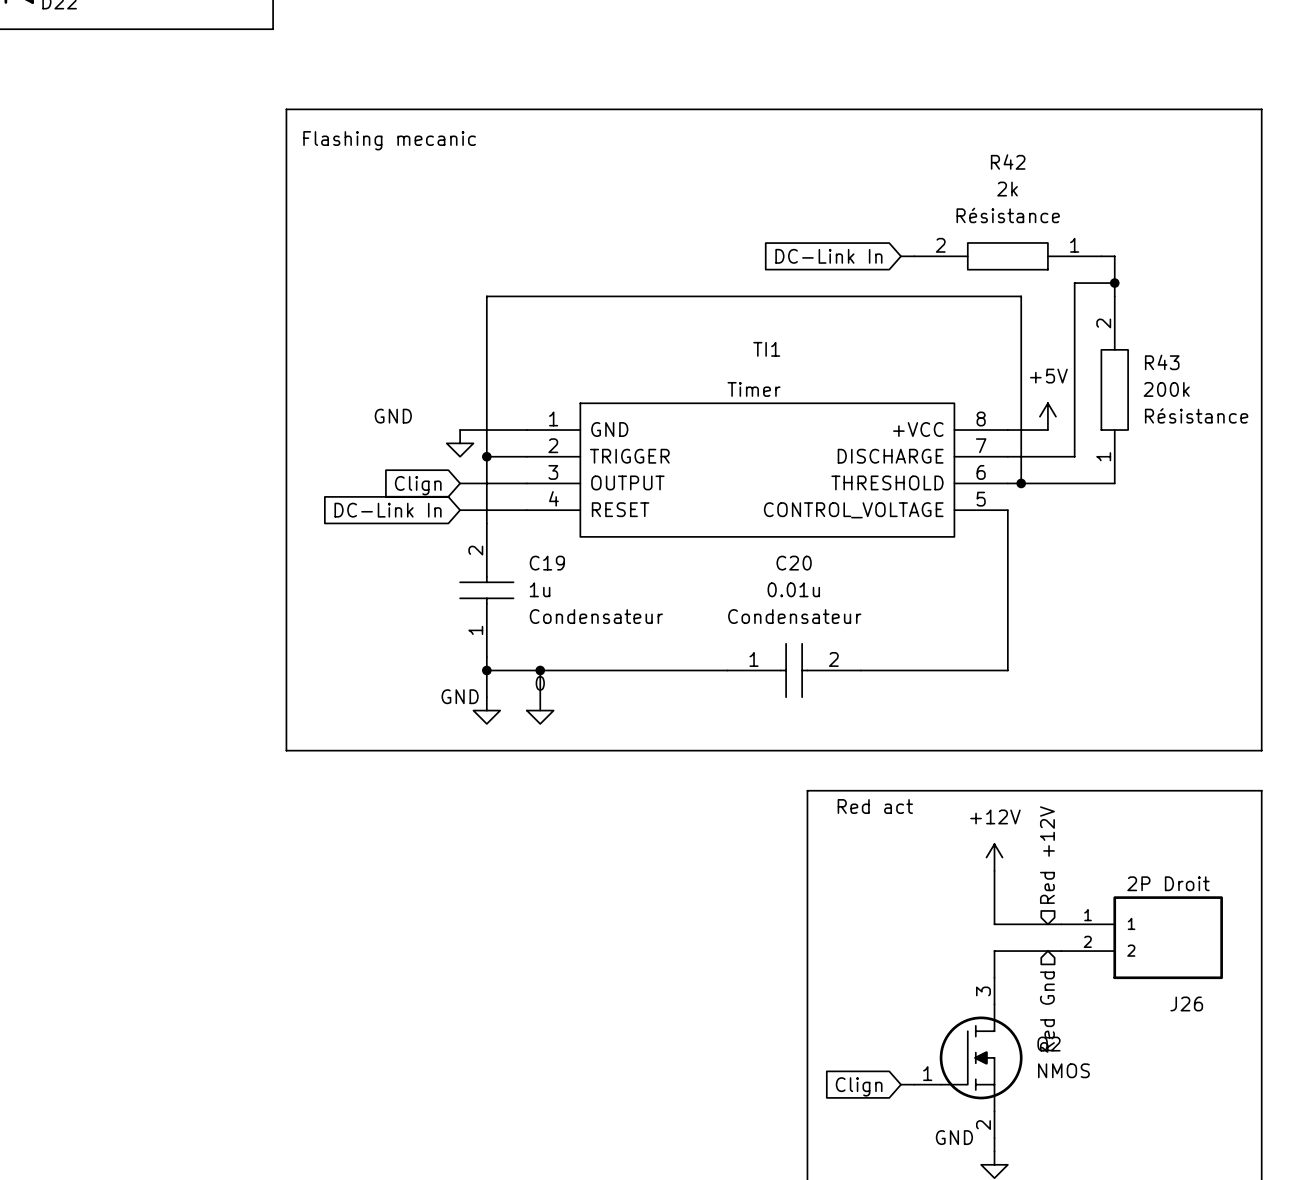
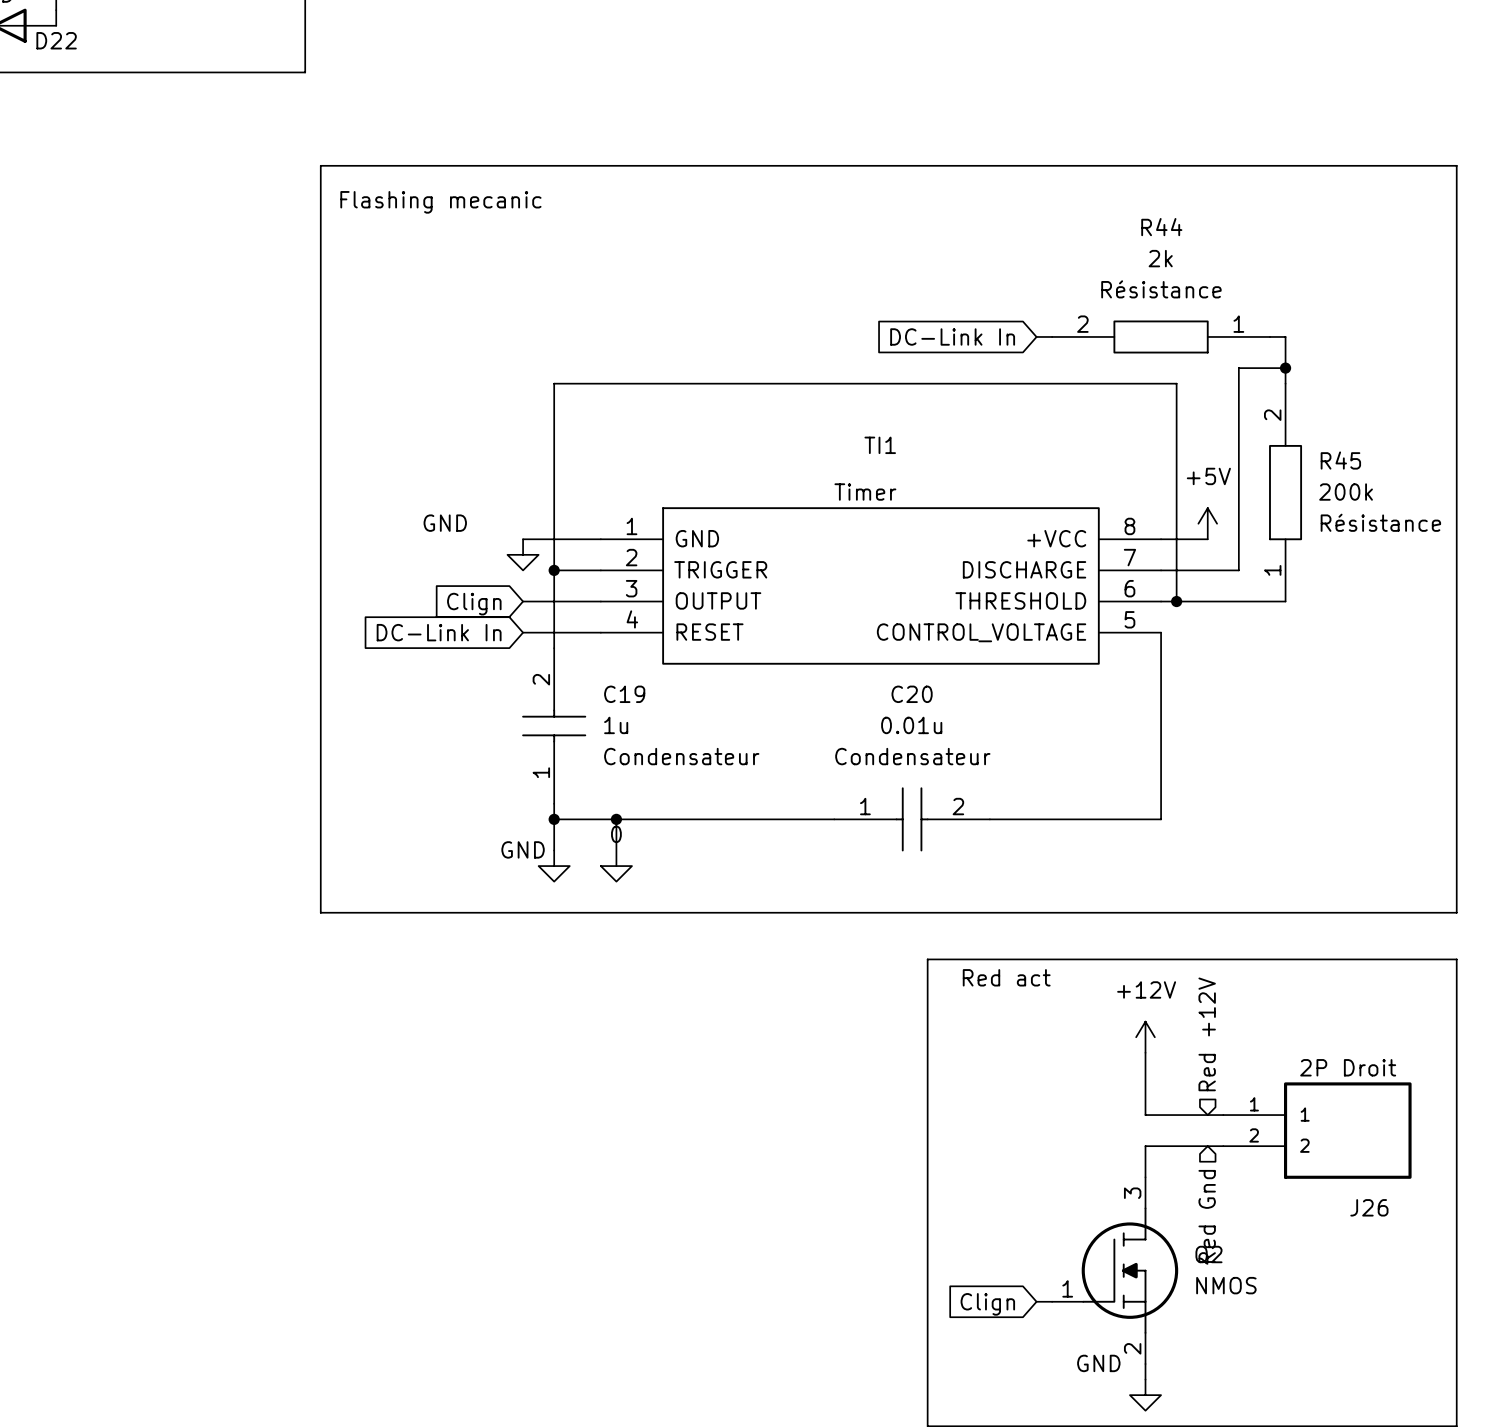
R42 name: R42 (1008, 162) -> R44 (1161, 227)
R43 name: R43 (1162, 362) -> R45 (1340, 460)

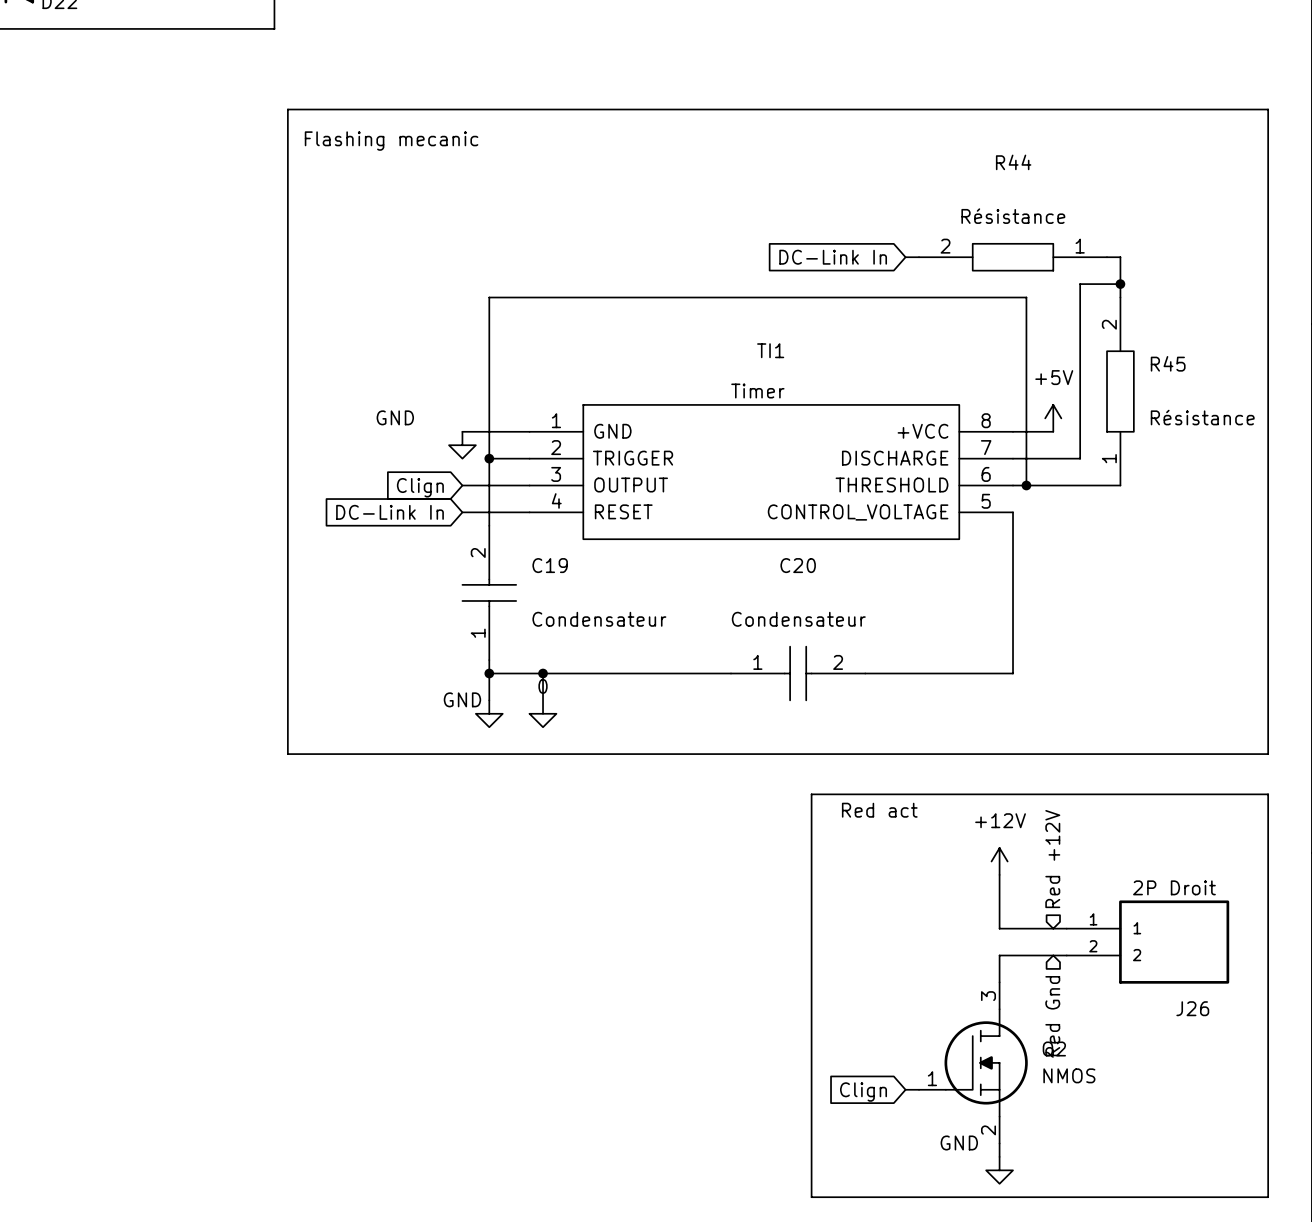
R44 text: 2k (1160, 258) -> none
R45 text: 200k (1346, 492) -> none
C19 text: 1u (616, 725) -> none
C20 text: 0.01u (911, 725) -> none

